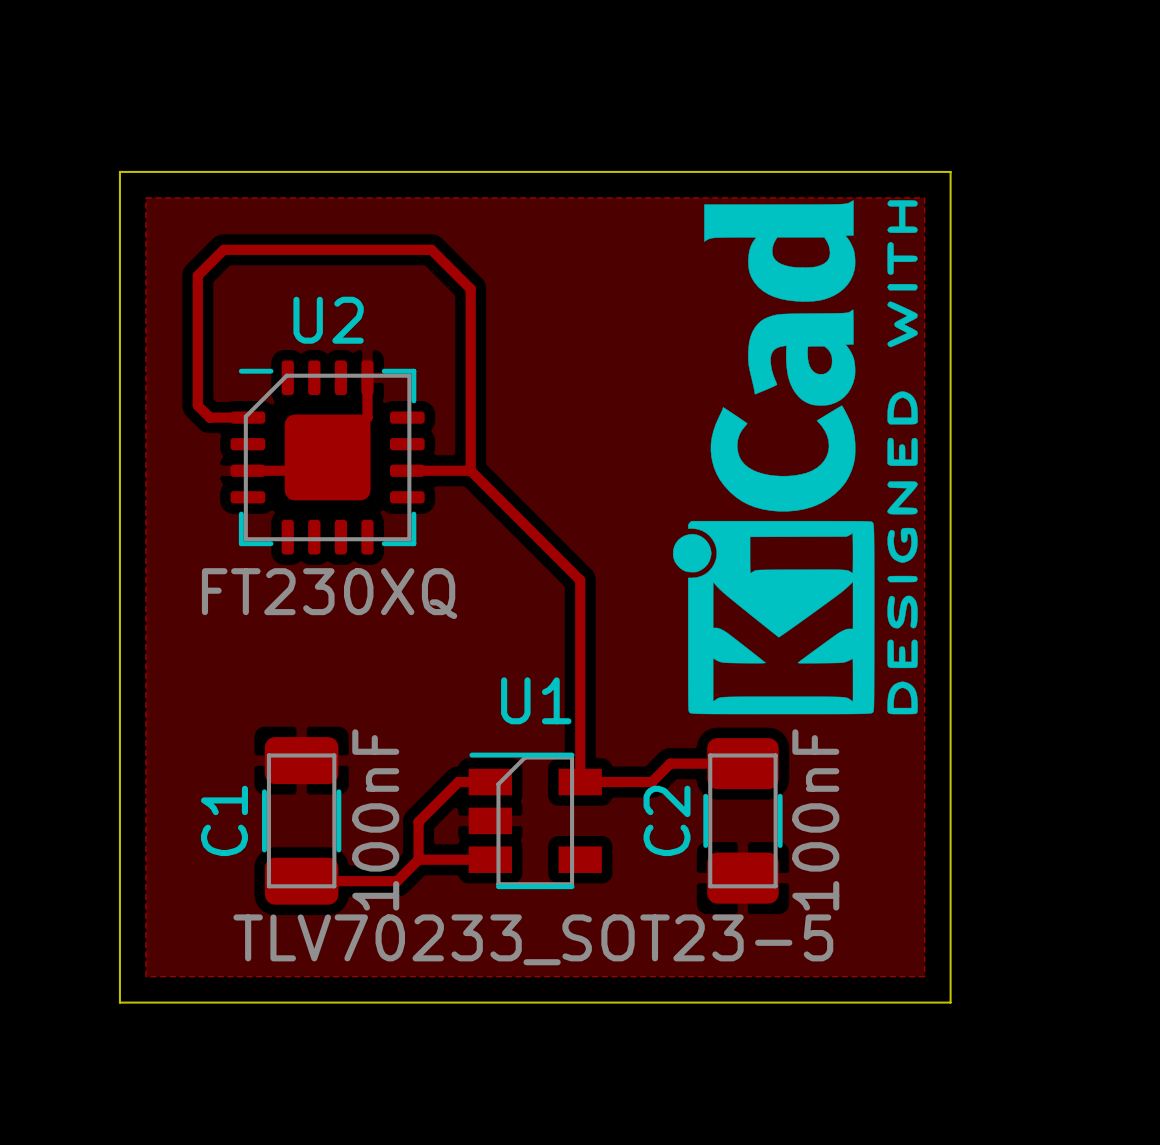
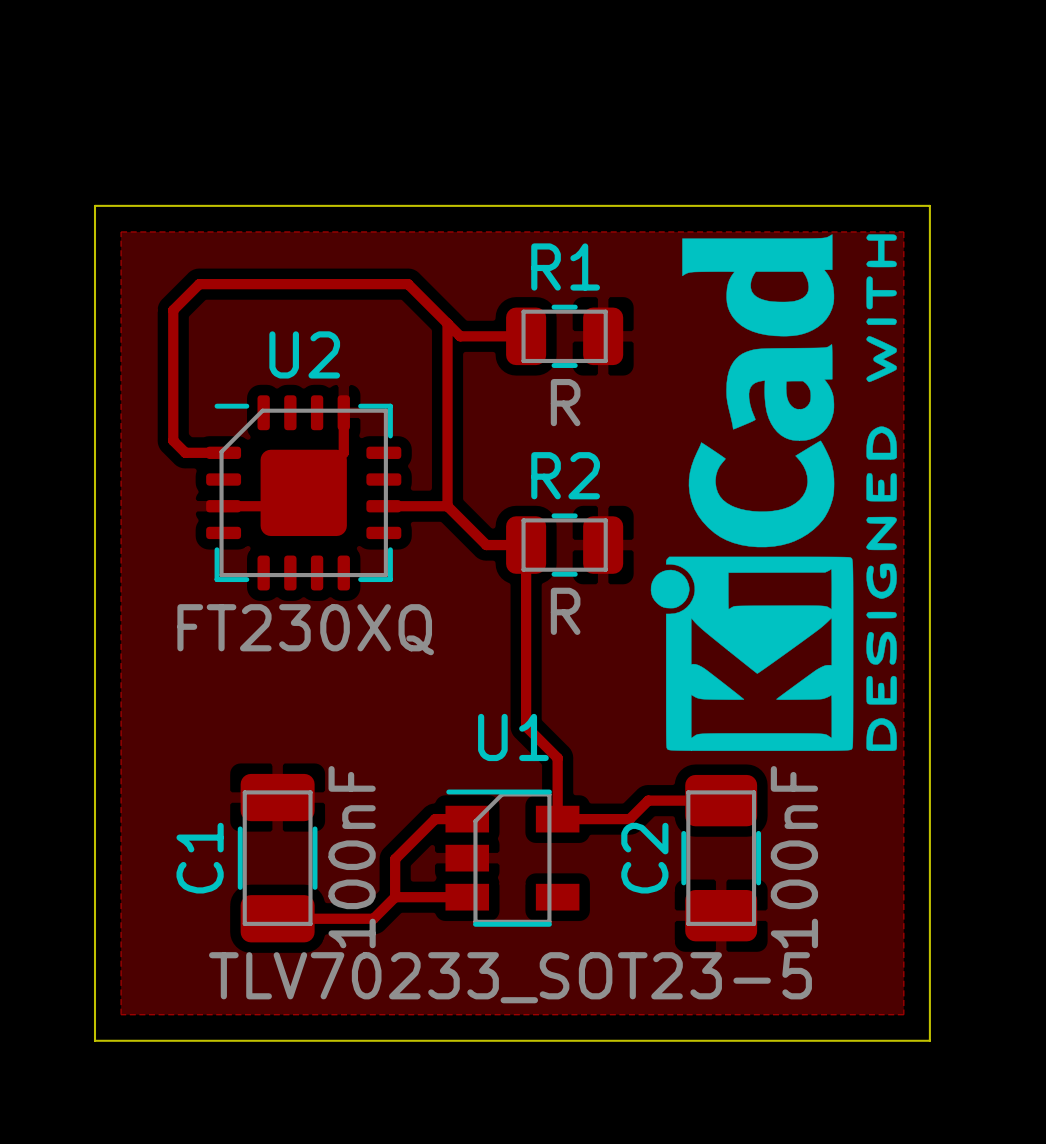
top track: none -> (447, 323) (460, 336) (526, 336)
R1: none -> R (564, 336)
top track: (509, 509) (580, 580) (580, 721) -> (486, 545) (526, 545) (526, 726) (557, 758)
R2: none -> R (564, 545)

